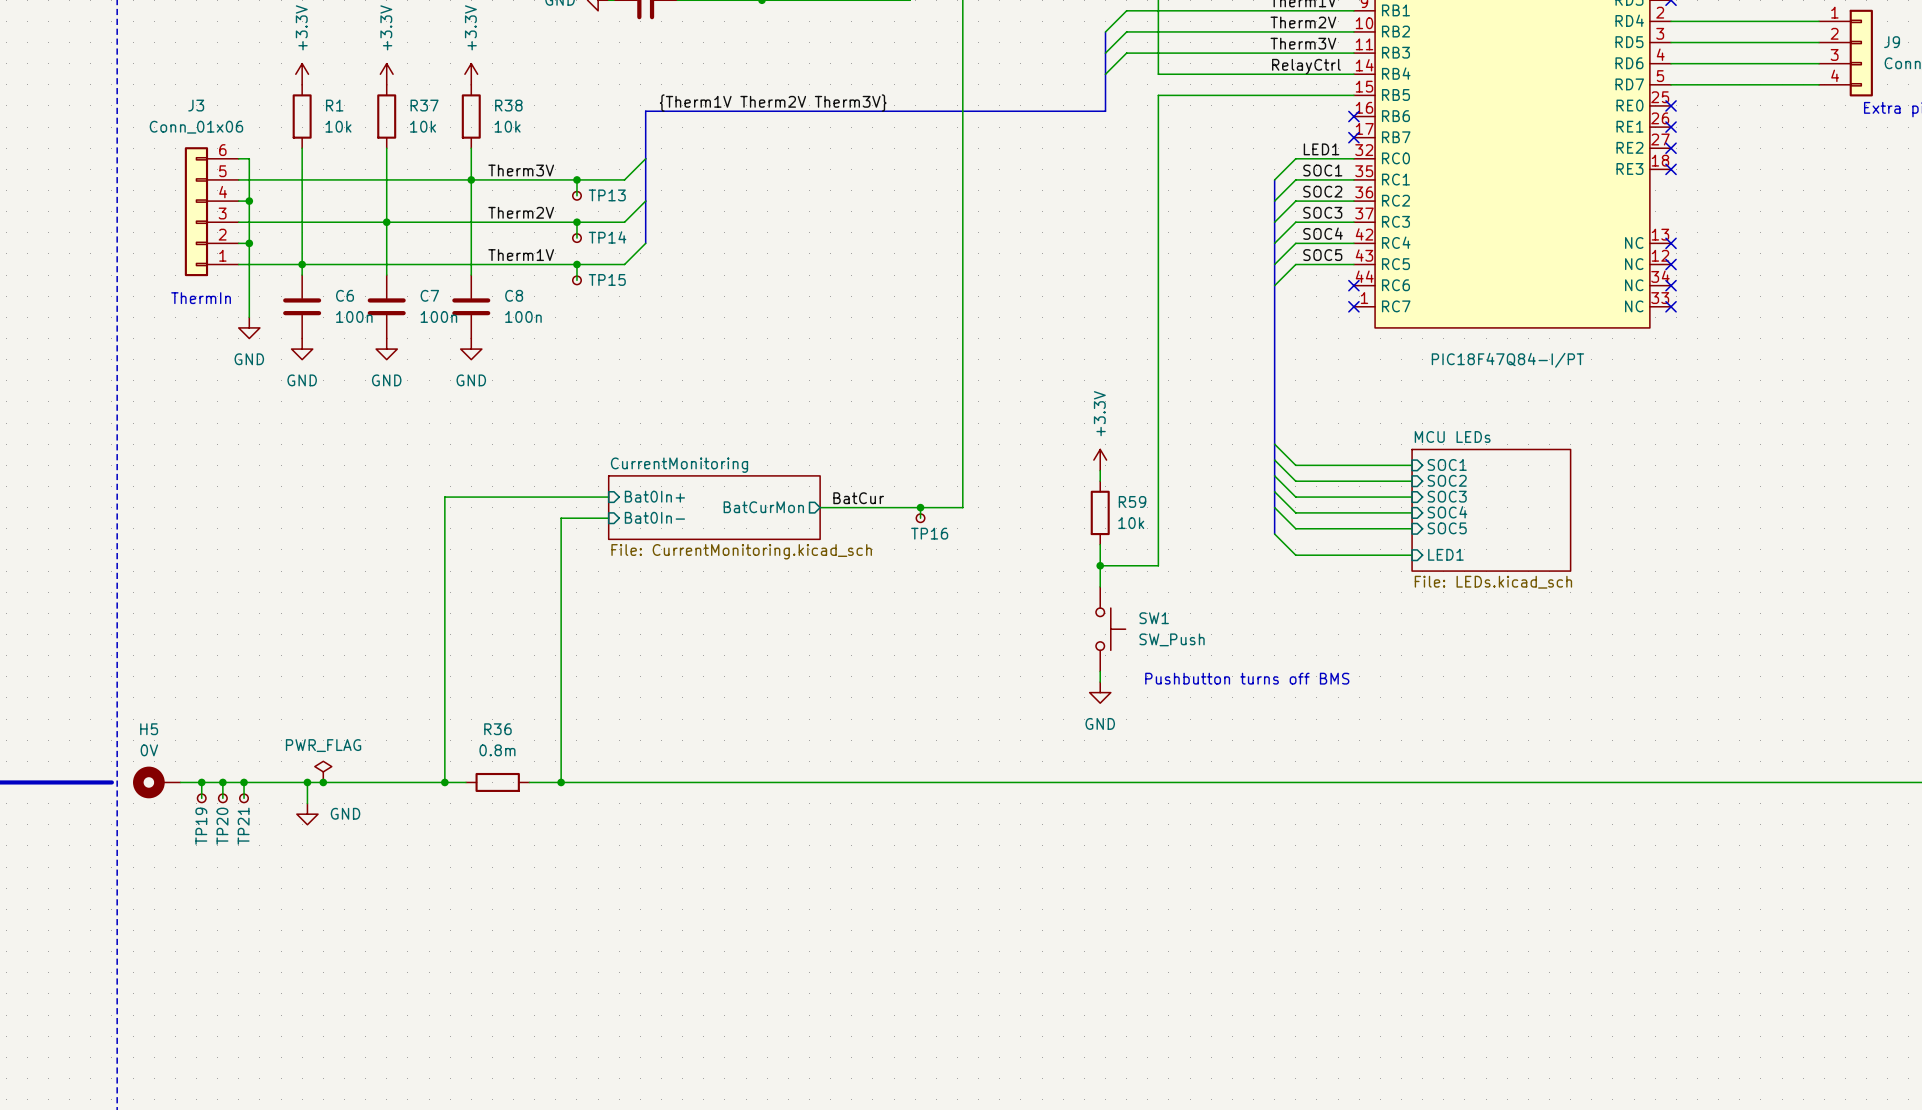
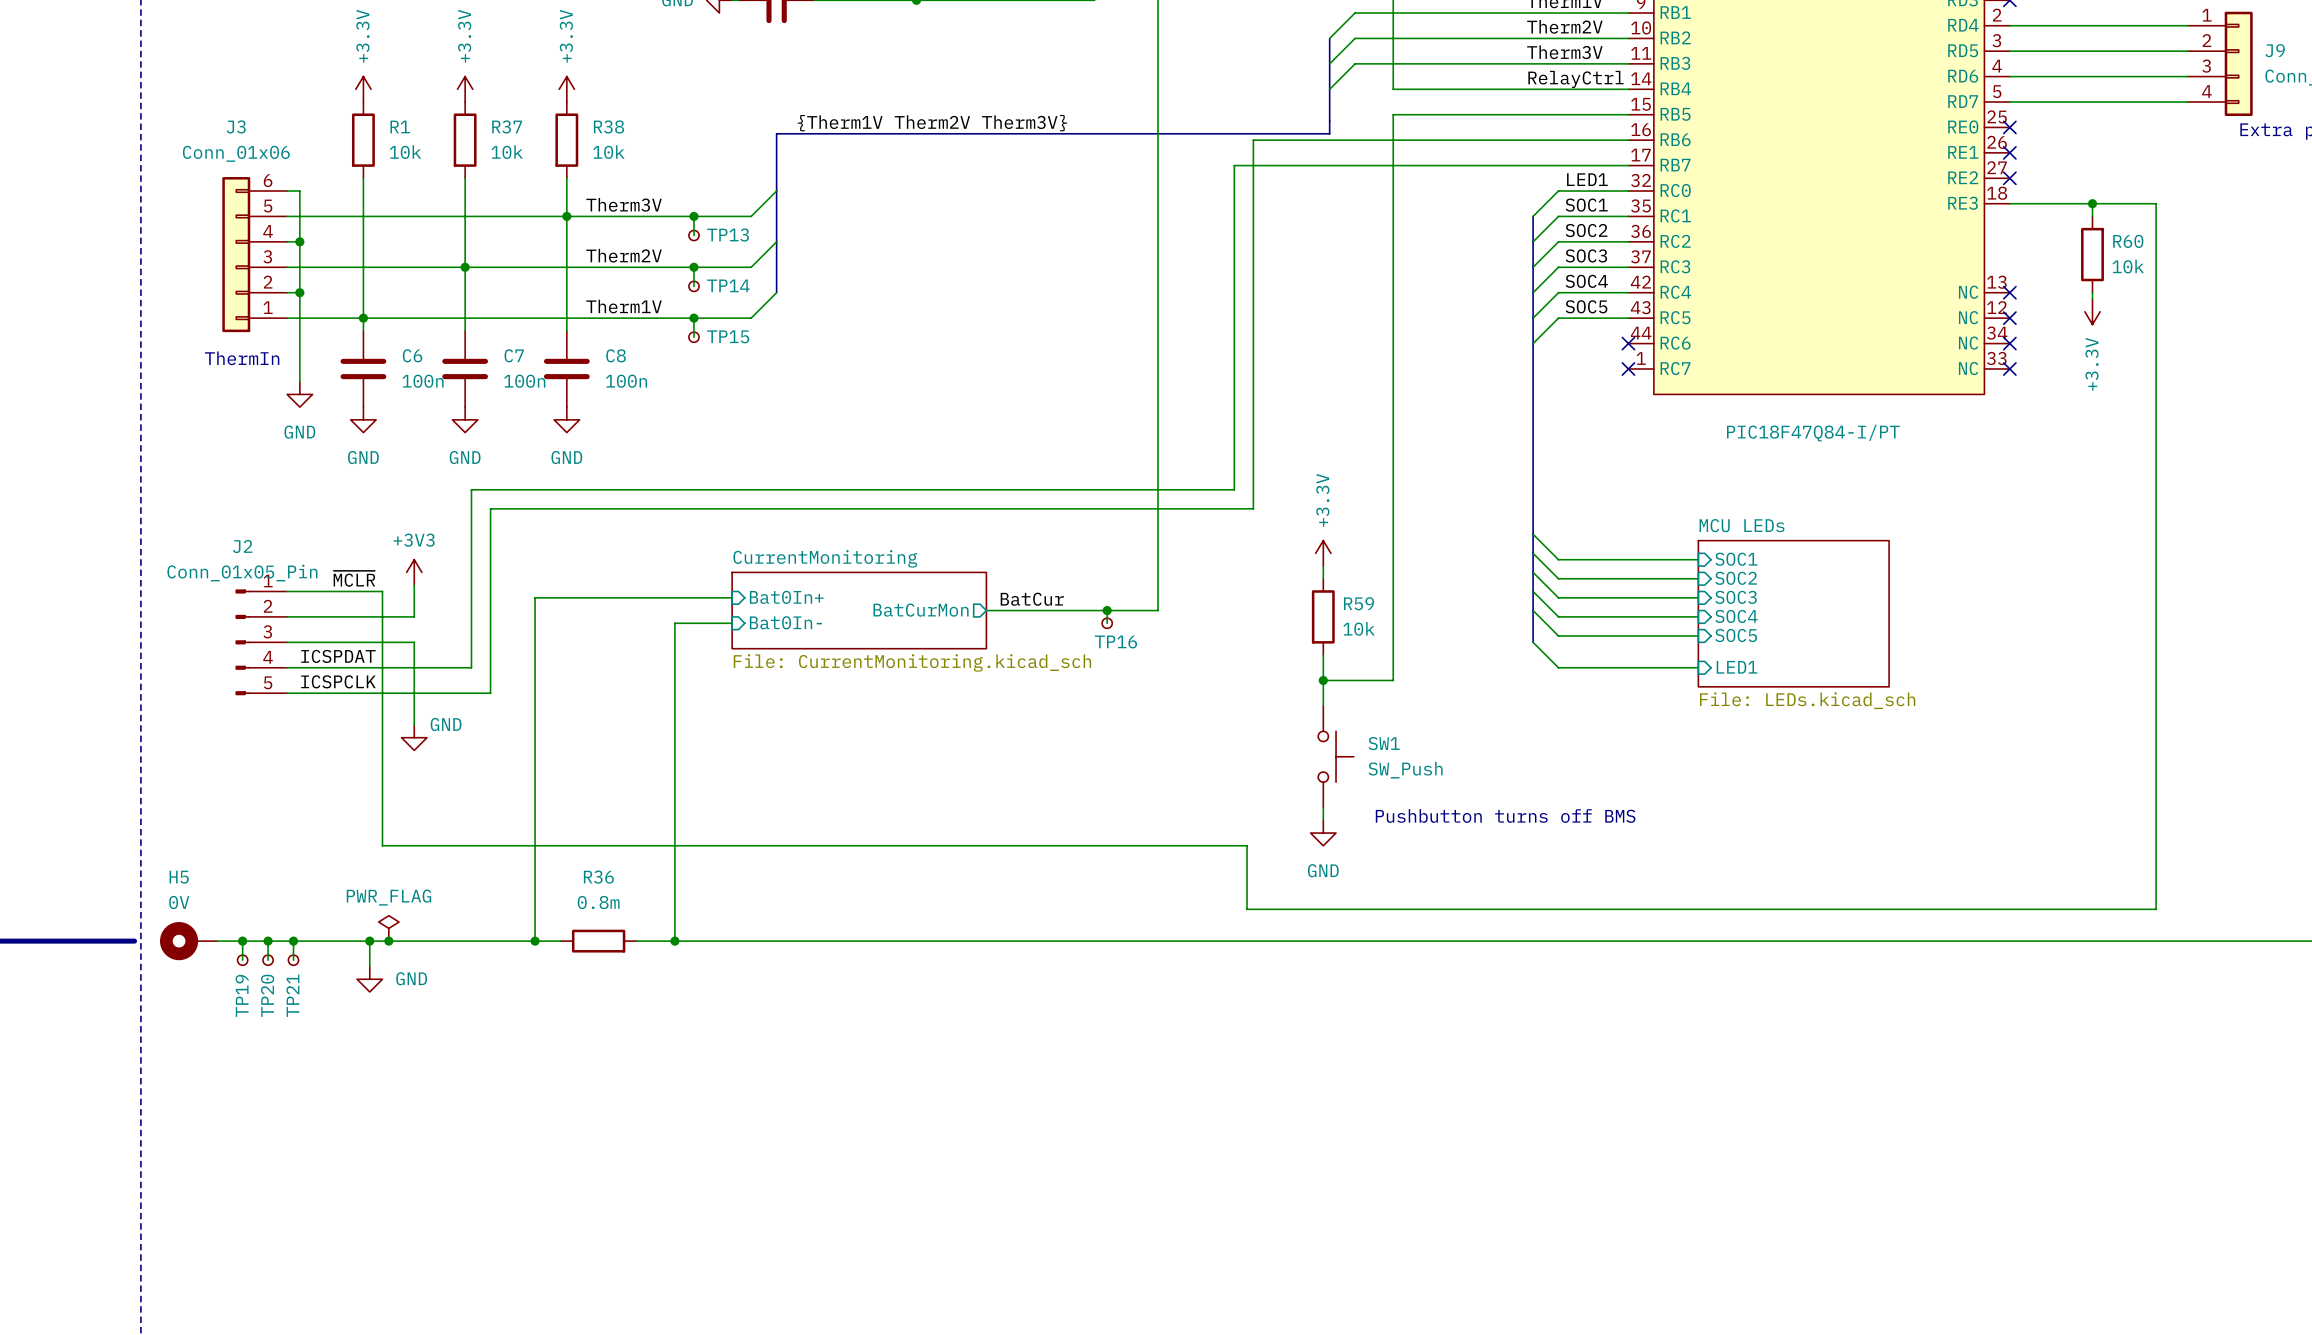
wire: none -> (1628, 140) (1253, 140) (1253, 508) (490, 508) (490, 693) (287, 693)
no-connect mark: (1353, 116) -> none
wire: none -> (1628, 165) (1234, 165) (1234, 489) (471, 489) (471, 667) (287, 667)
no-connect mark: (1353, 137) -> none
wire: none -> (2009, 203) (2156, 203) (2156, 909) (1247, 909) (1247, 845) (382, 845) (382, 591) (287, 591)
no-connect mark: (1671, 169) -> none
wire: none -> (2092, 203) (2092, 216)
junction: none -> (2092, 203)
R60: none -> 10k (2092, 254)
wire: none -> (2092, 292) (2092, 299)
power symbol: none -> +3.3V (2092, 311)
power symbol: none -> +3V3 (414, 572)
label: none -> ~{MCLR} (354, 578)
wire: none -> (414, 585) (414, 616) (287, 616)
J2: none -> Conn_01x05_Pin (261, 642)
wire: none -> (287, 642) (414, 642) (414, 724)
label: none -> ICSPDAT (338, 656)
label: none -> ICSPCLK (338, 681)
power symbol: none -> GND (414, 737)

